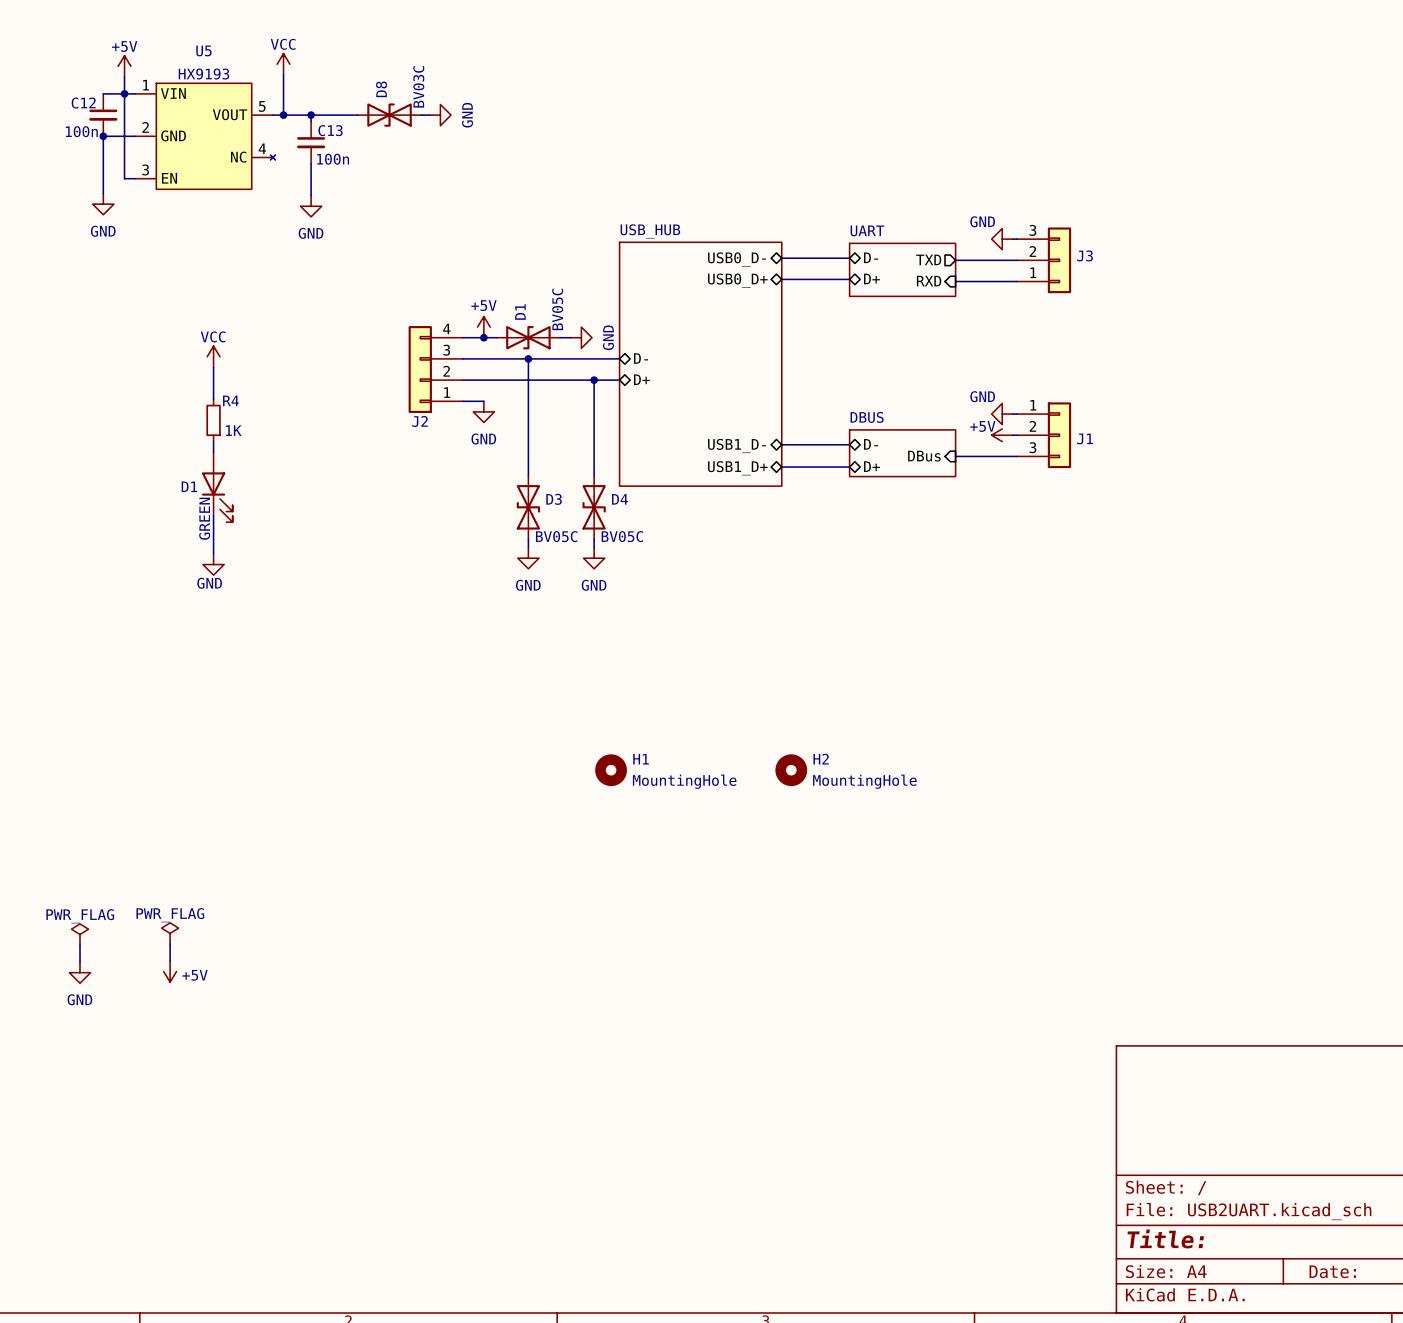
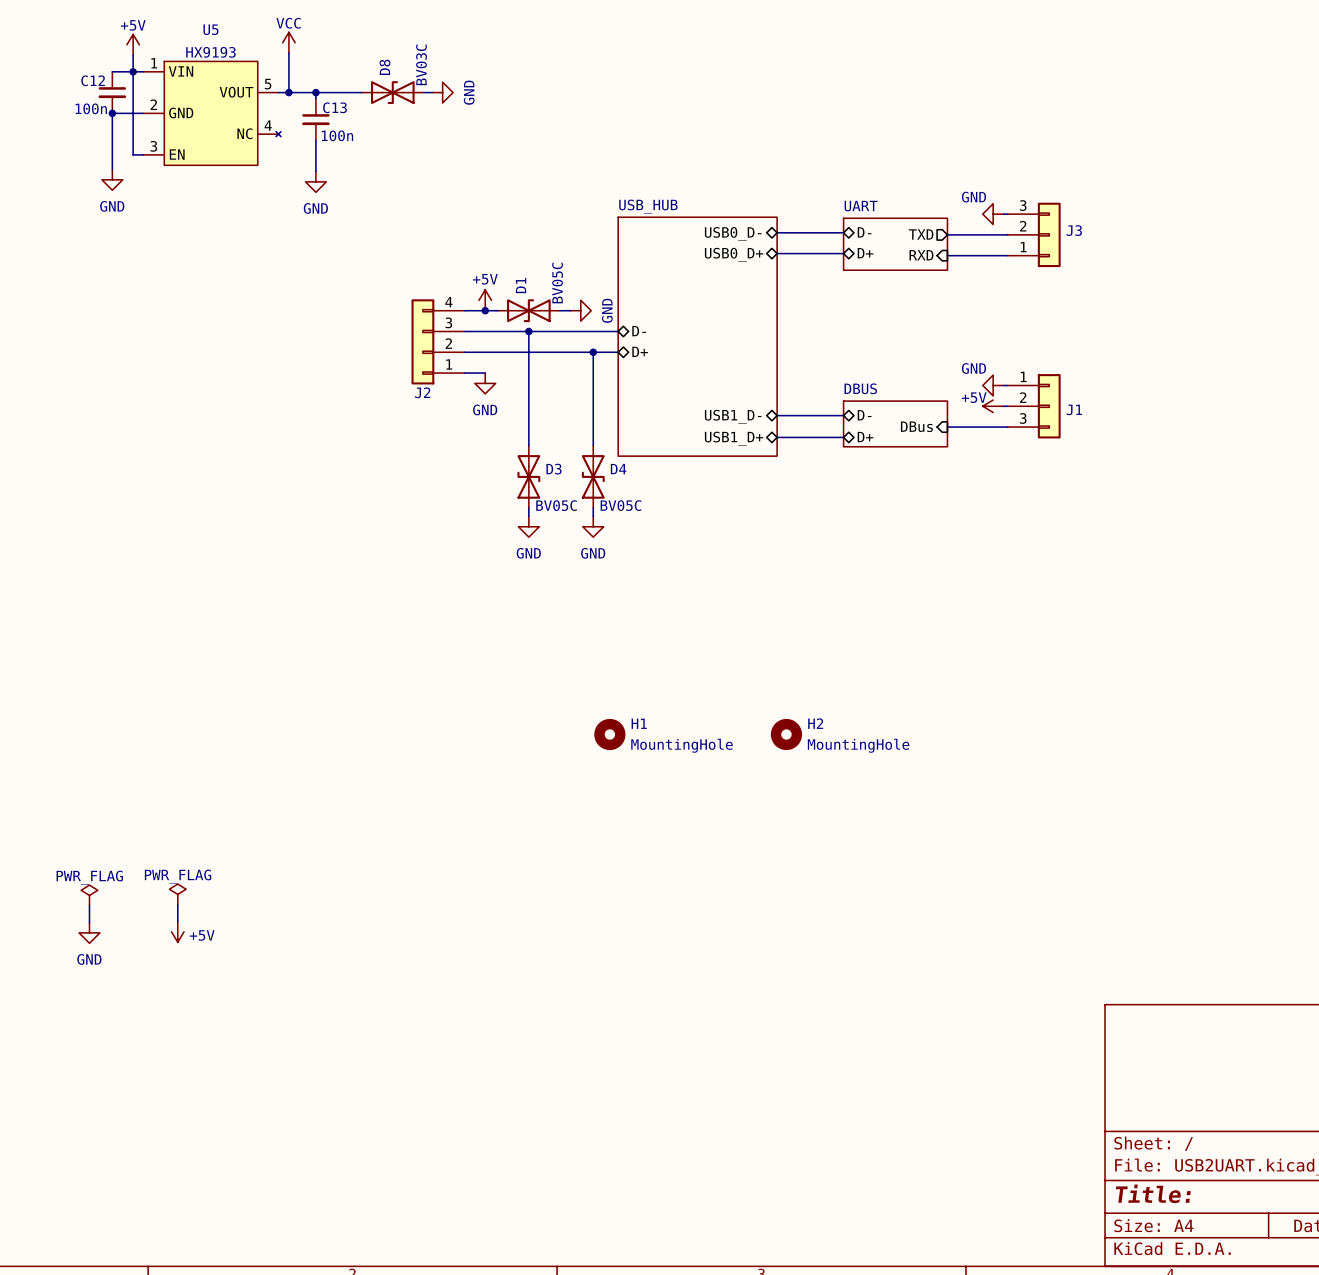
power symbol: VCC (213, 356) -> none
wire: (213, 367) (213, 399) -> none
R4: 1K (213, 420) -> none
wire: (213, 441) (213, 452) -> none
D1: GREEN (217, 487) -> none
wire: (213, 515) (213, 553) -> none
power symbol: GND (213, 564) -> none

